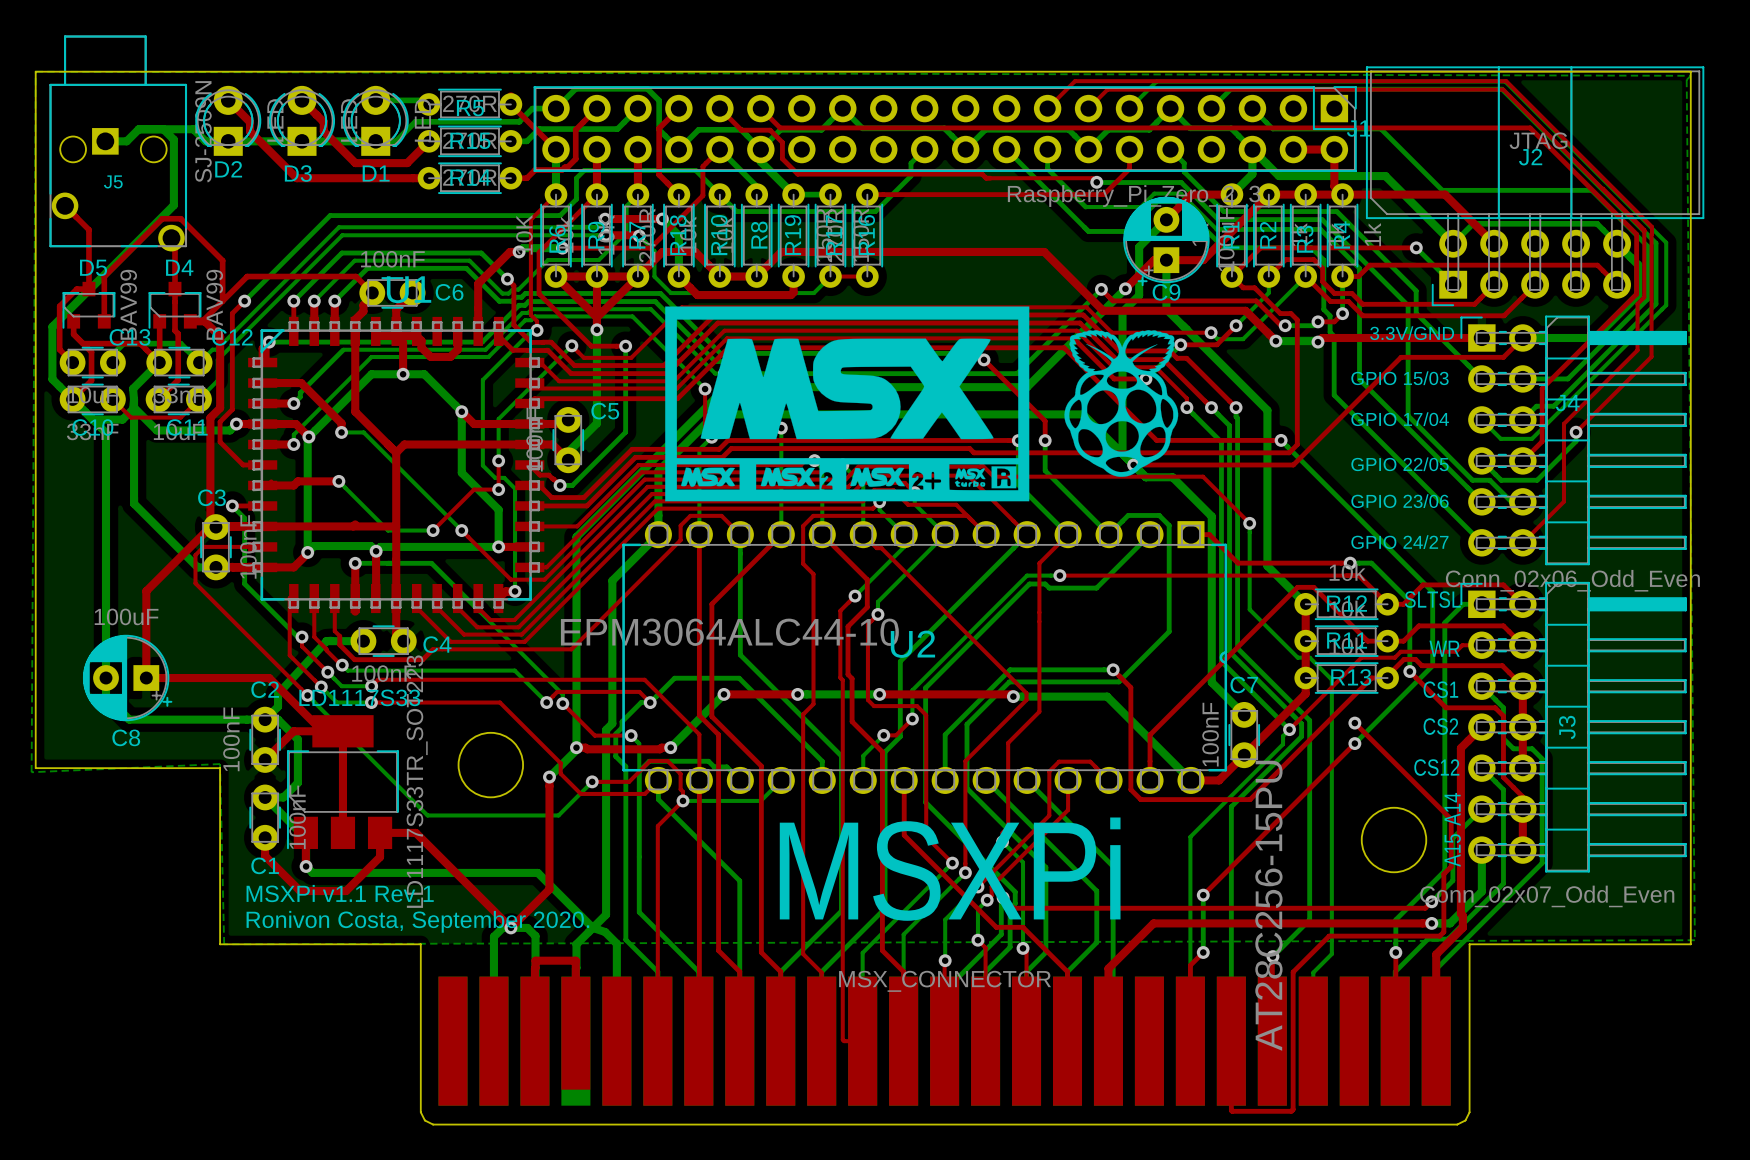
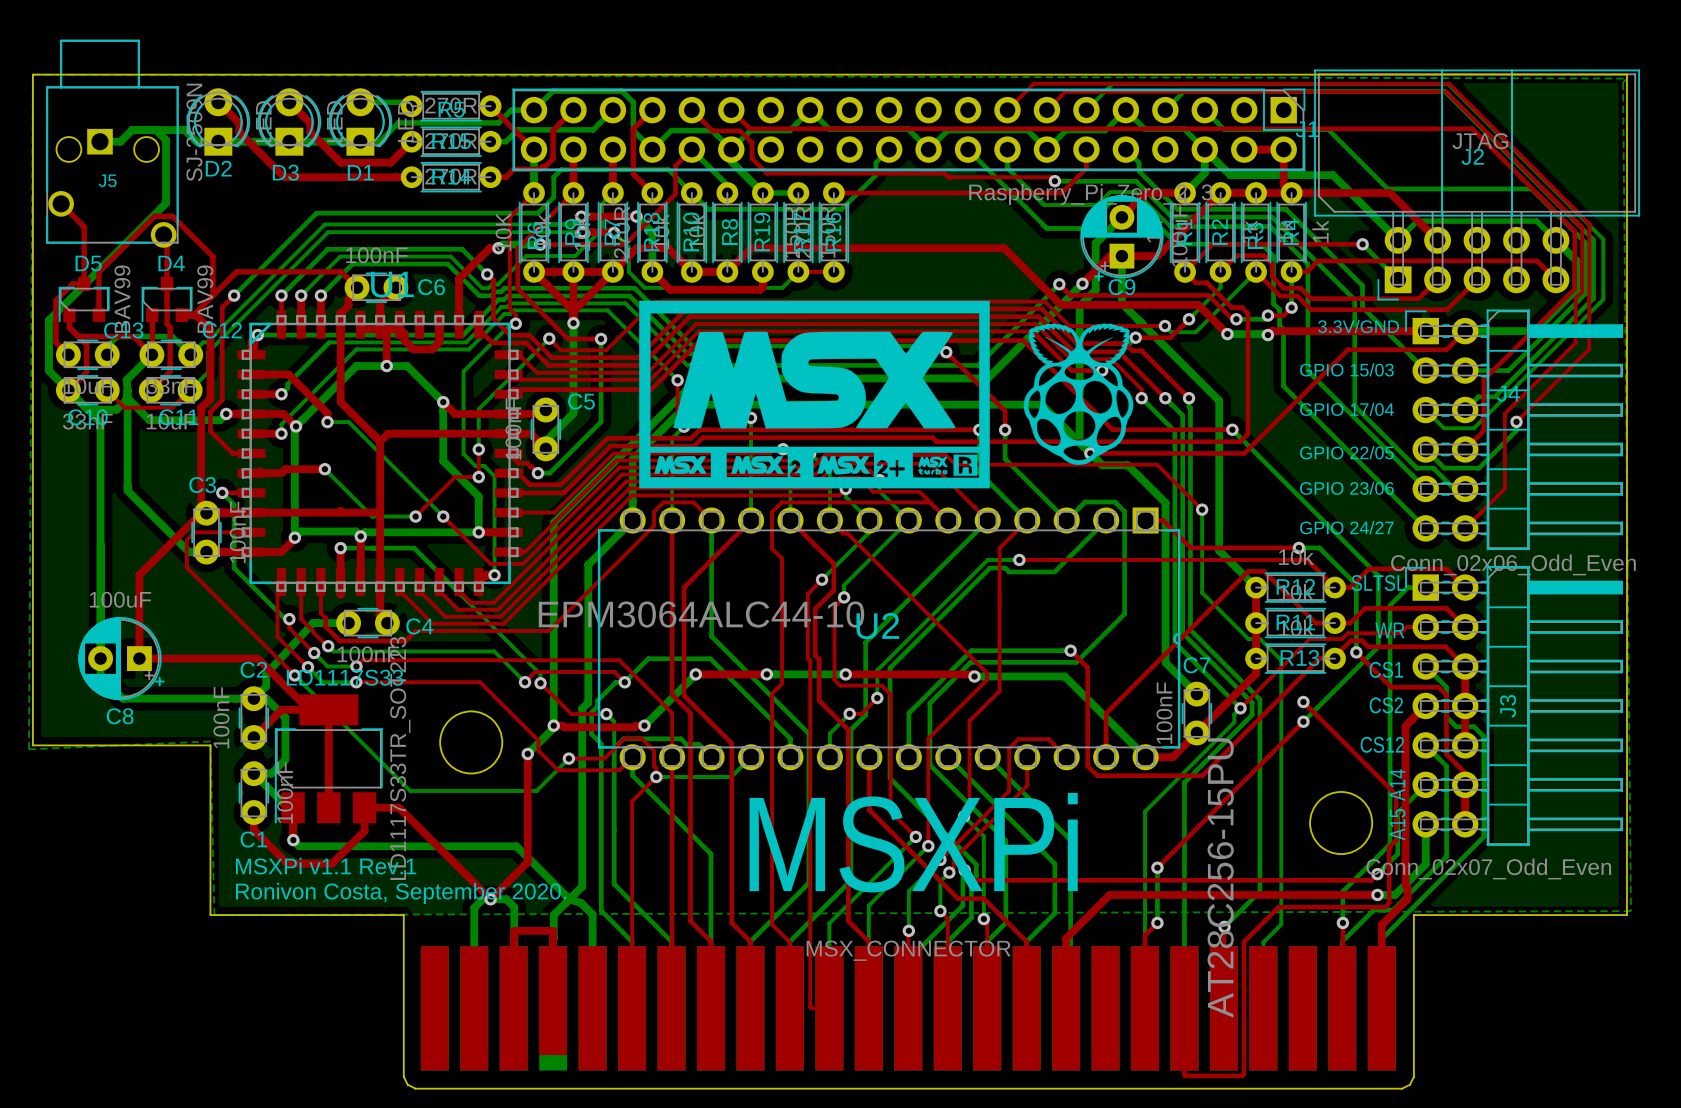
part footprint: [438, 732, 1451, 1106] -> [420, 711, 1396, 1071]

